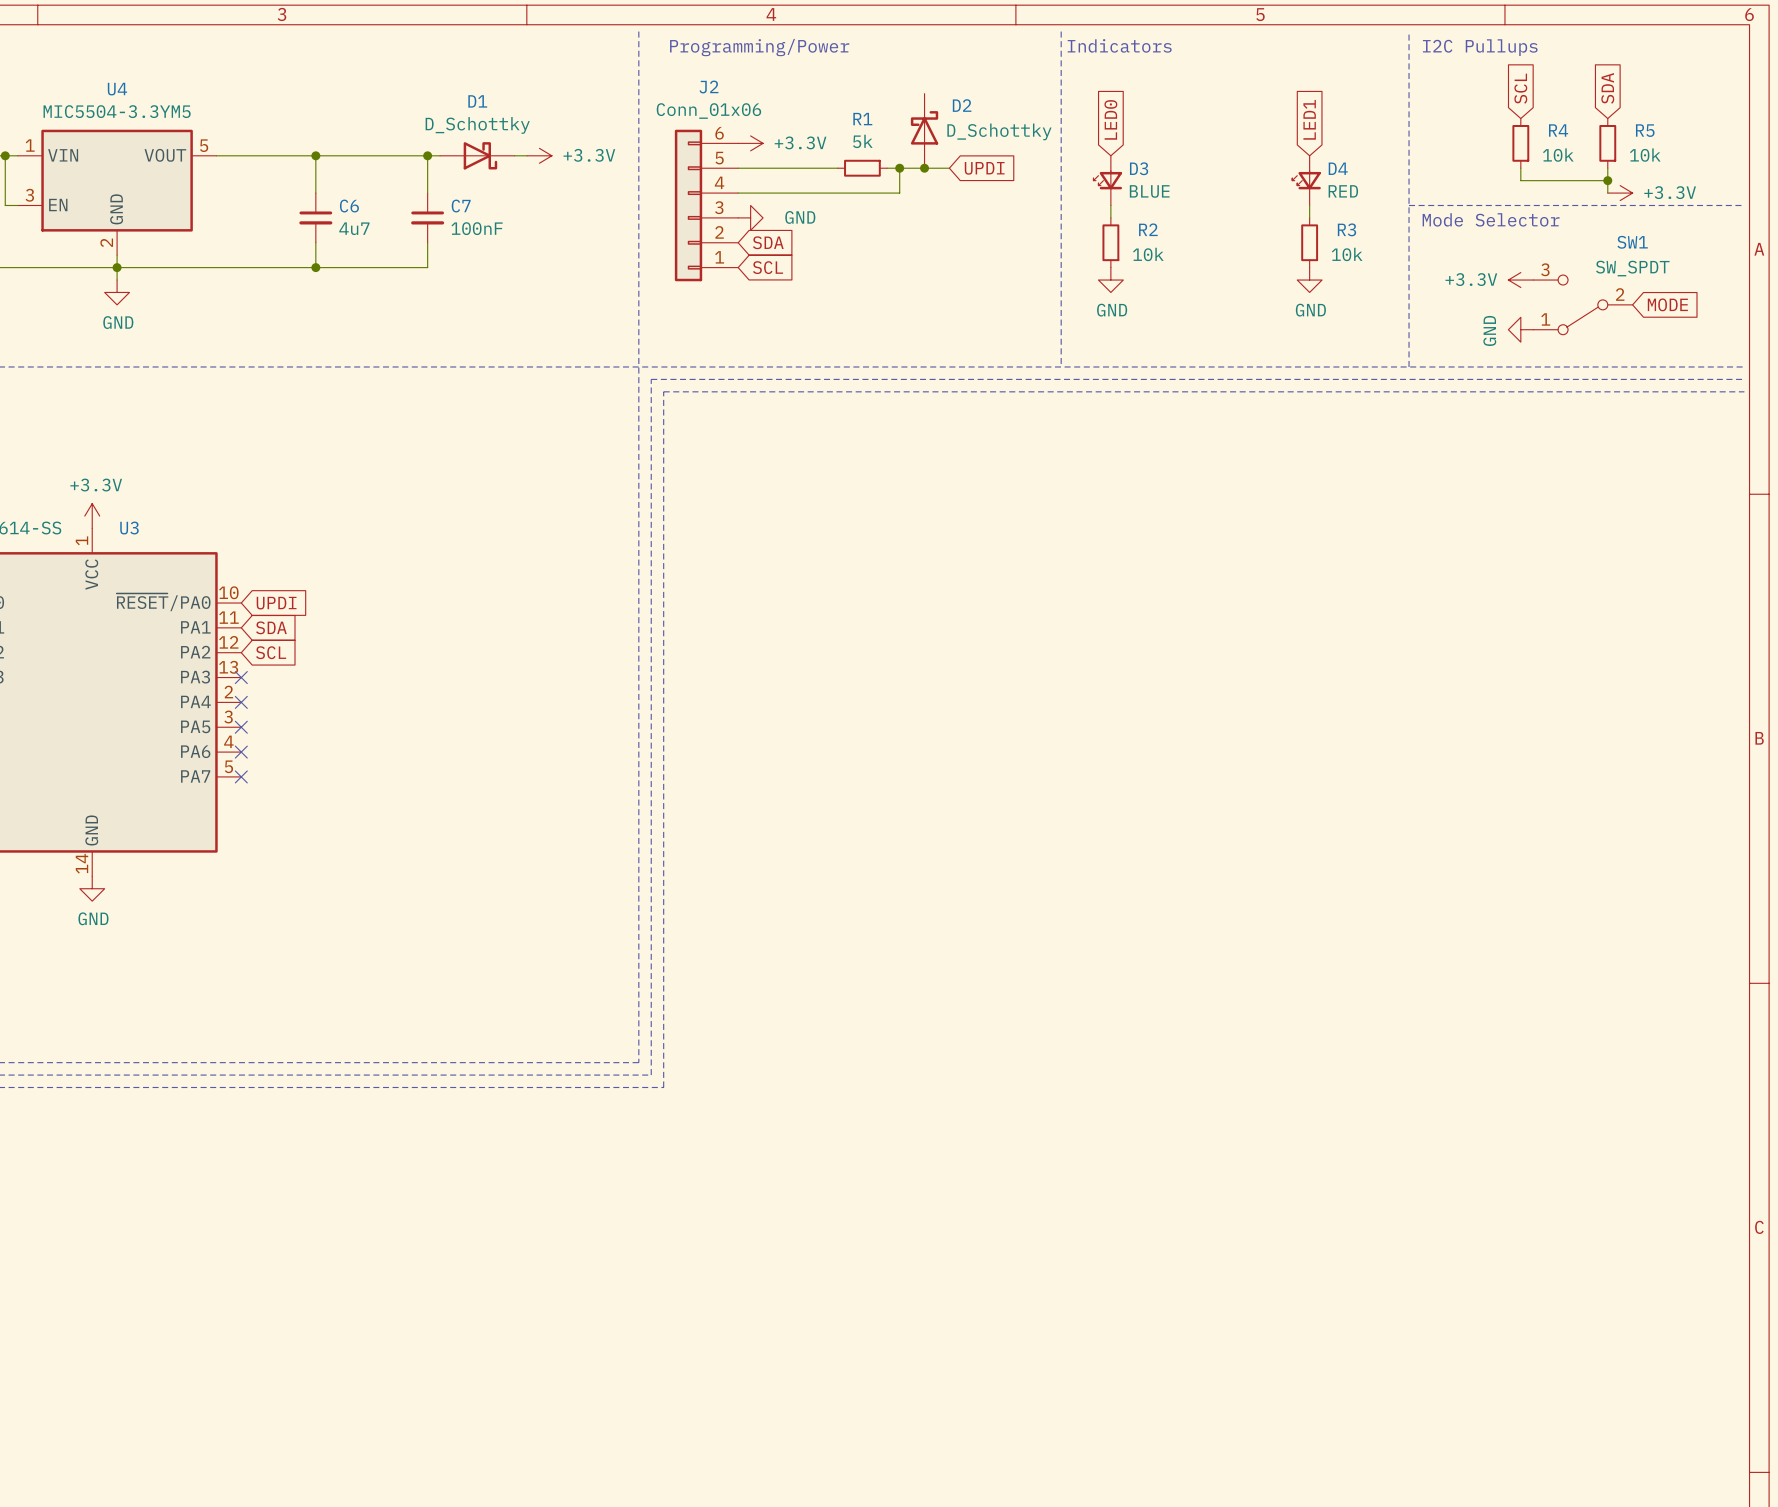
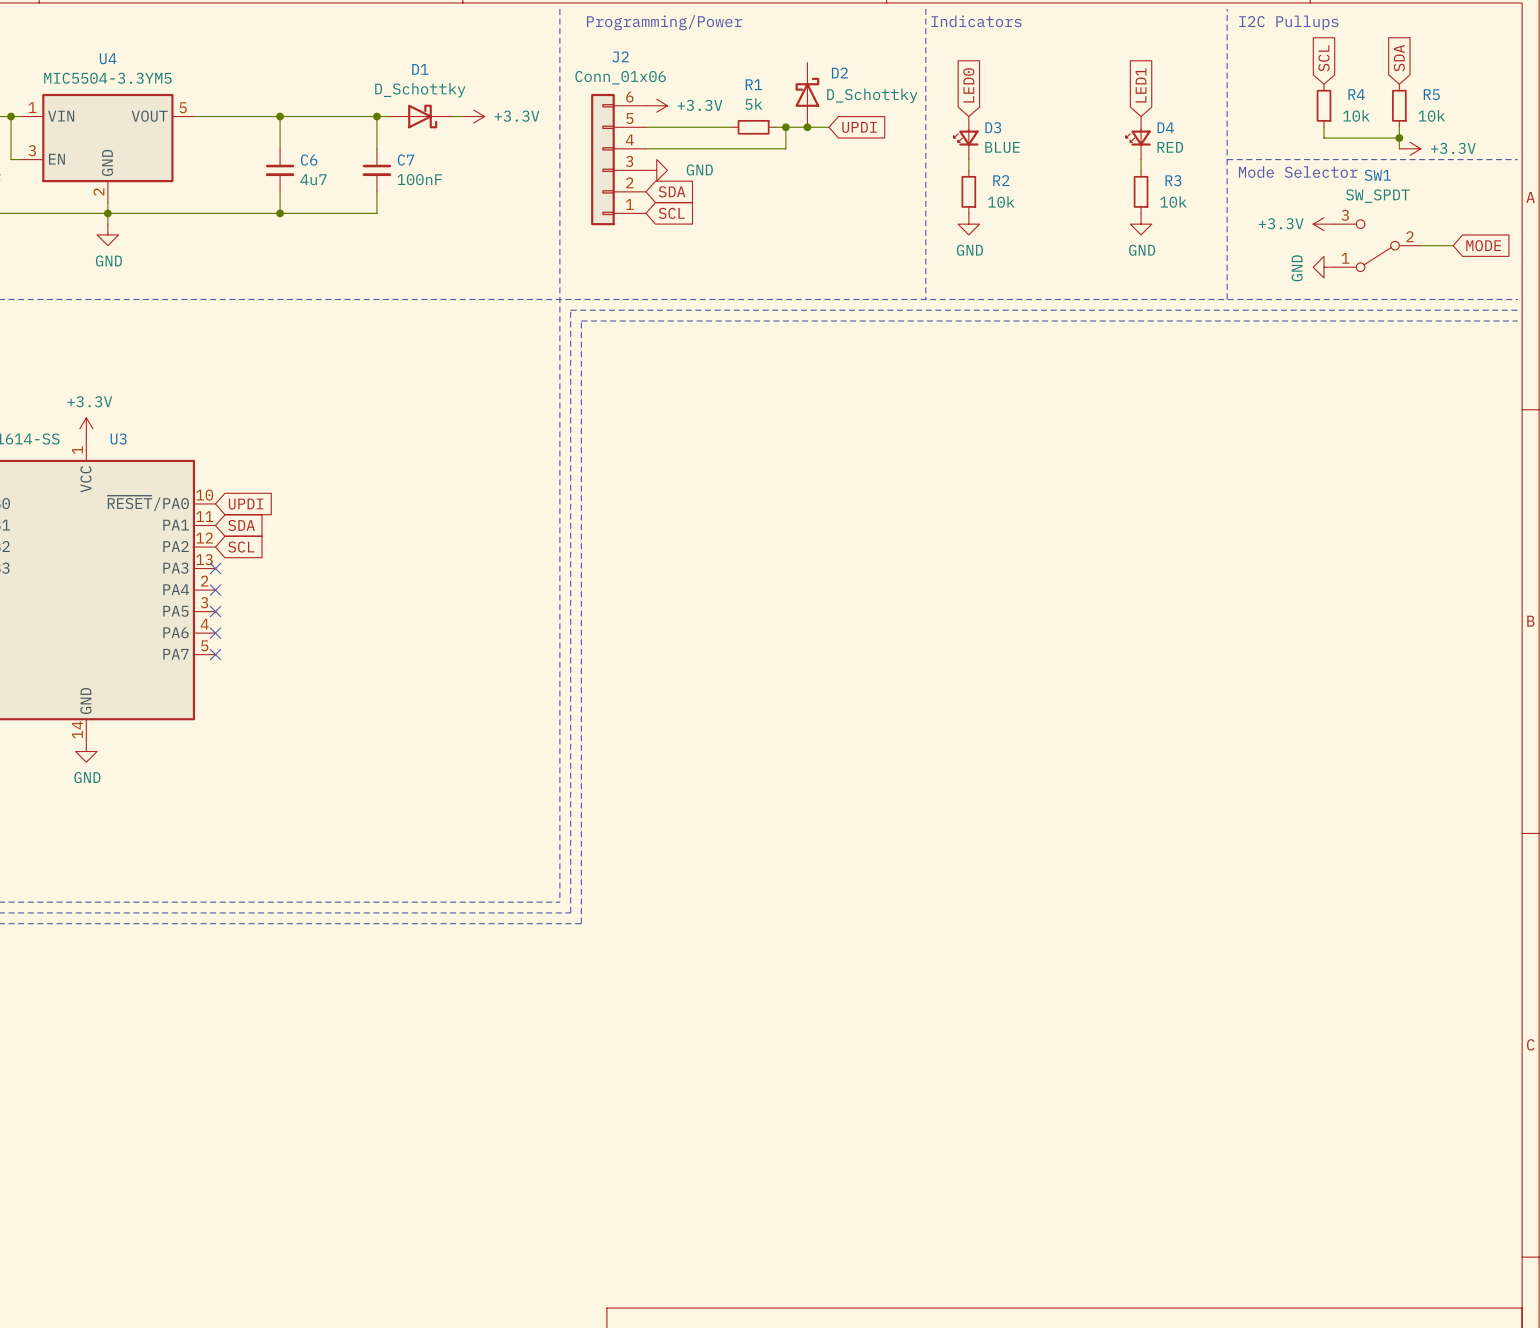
SW1 name position: SW1 (1632, 242) -> SW1 (1377, 175)
SW1 value position: SW_SPDT (1632, 268) -> SW_SPDT (1377, 196)
wire: none -> (1420, 245) (1453, 245)
global label position: MODE (1667, 304) -> MODE (1483, 245)

